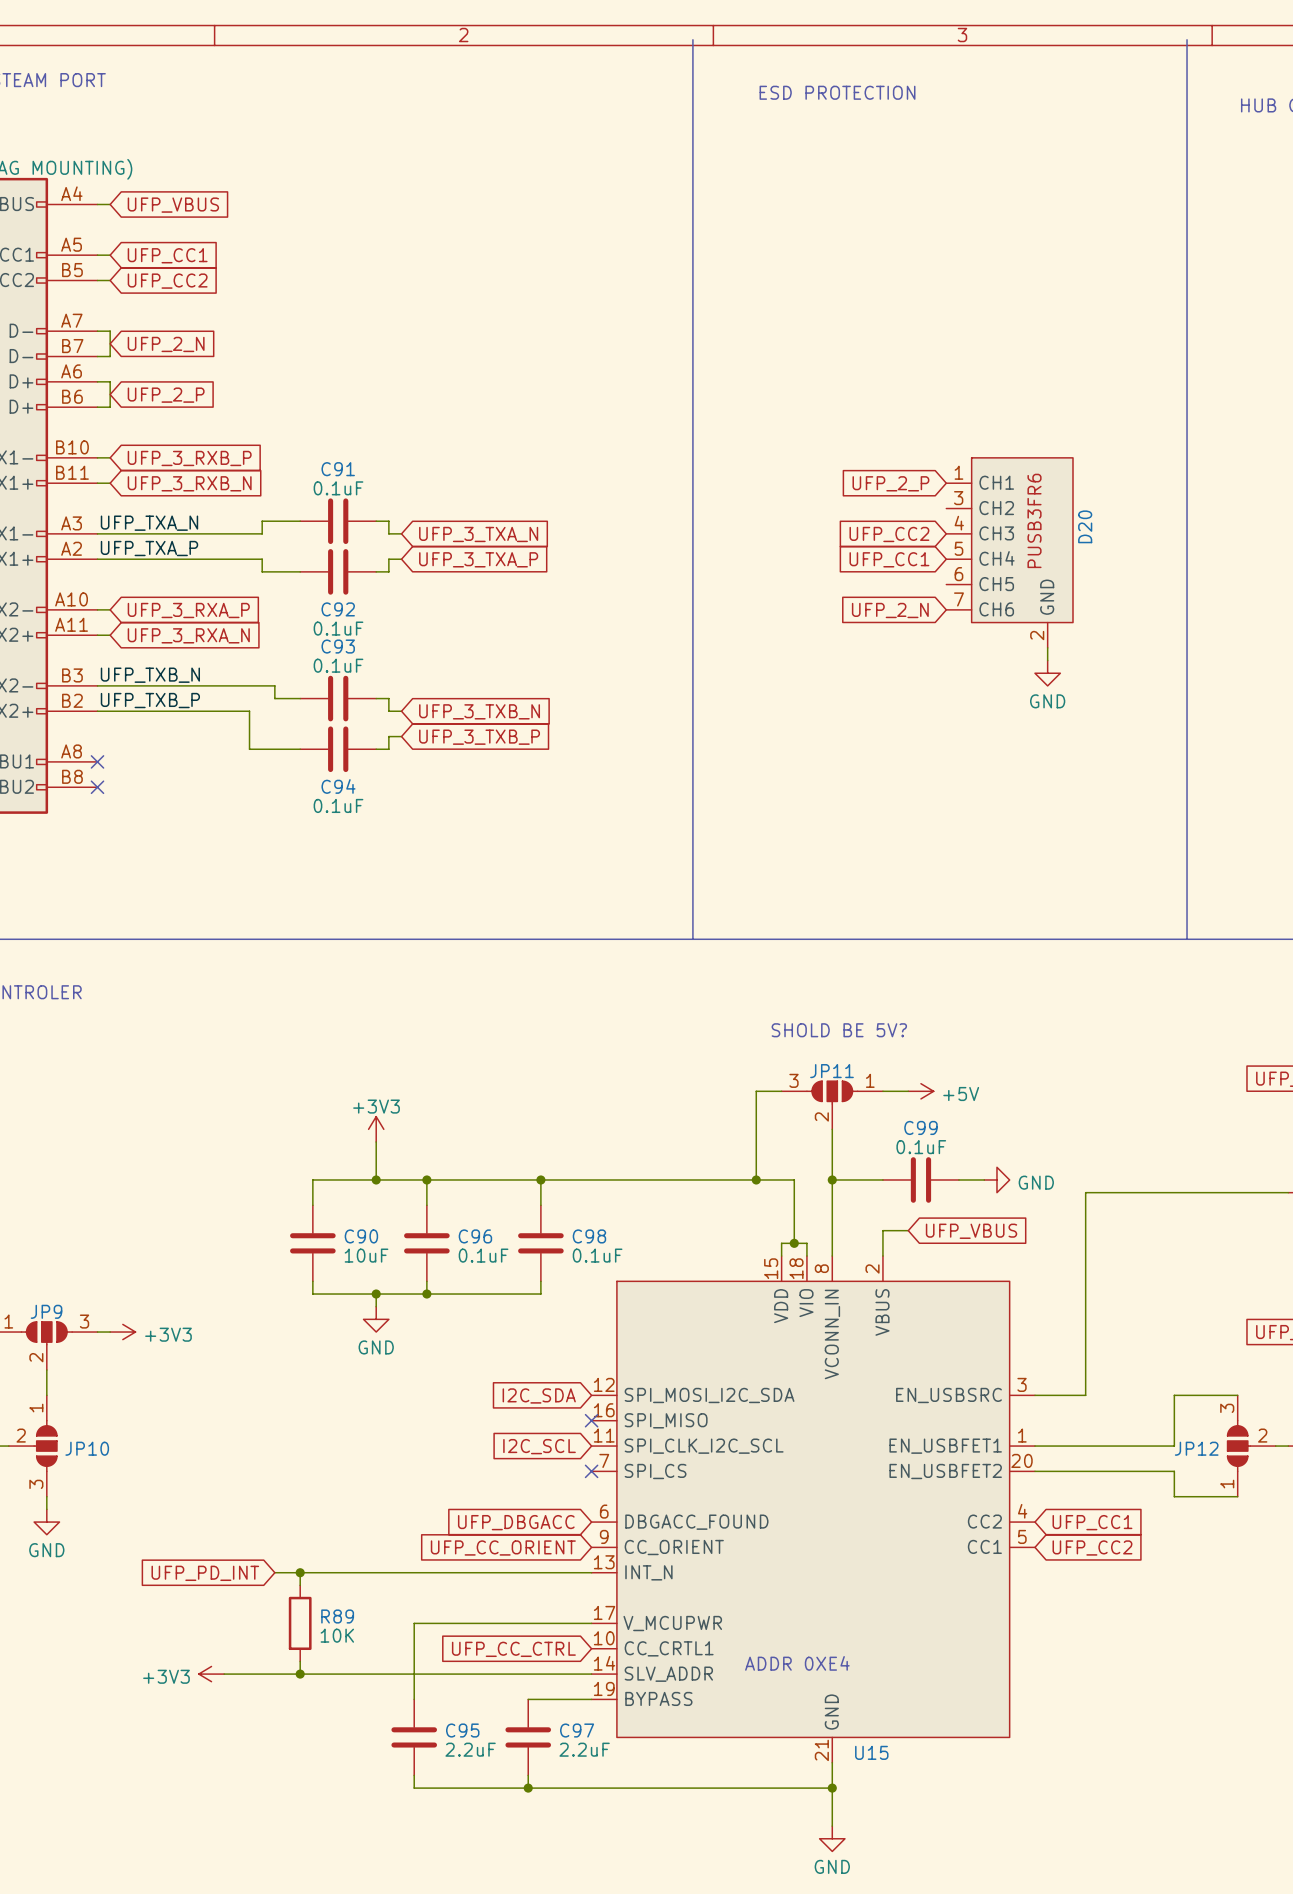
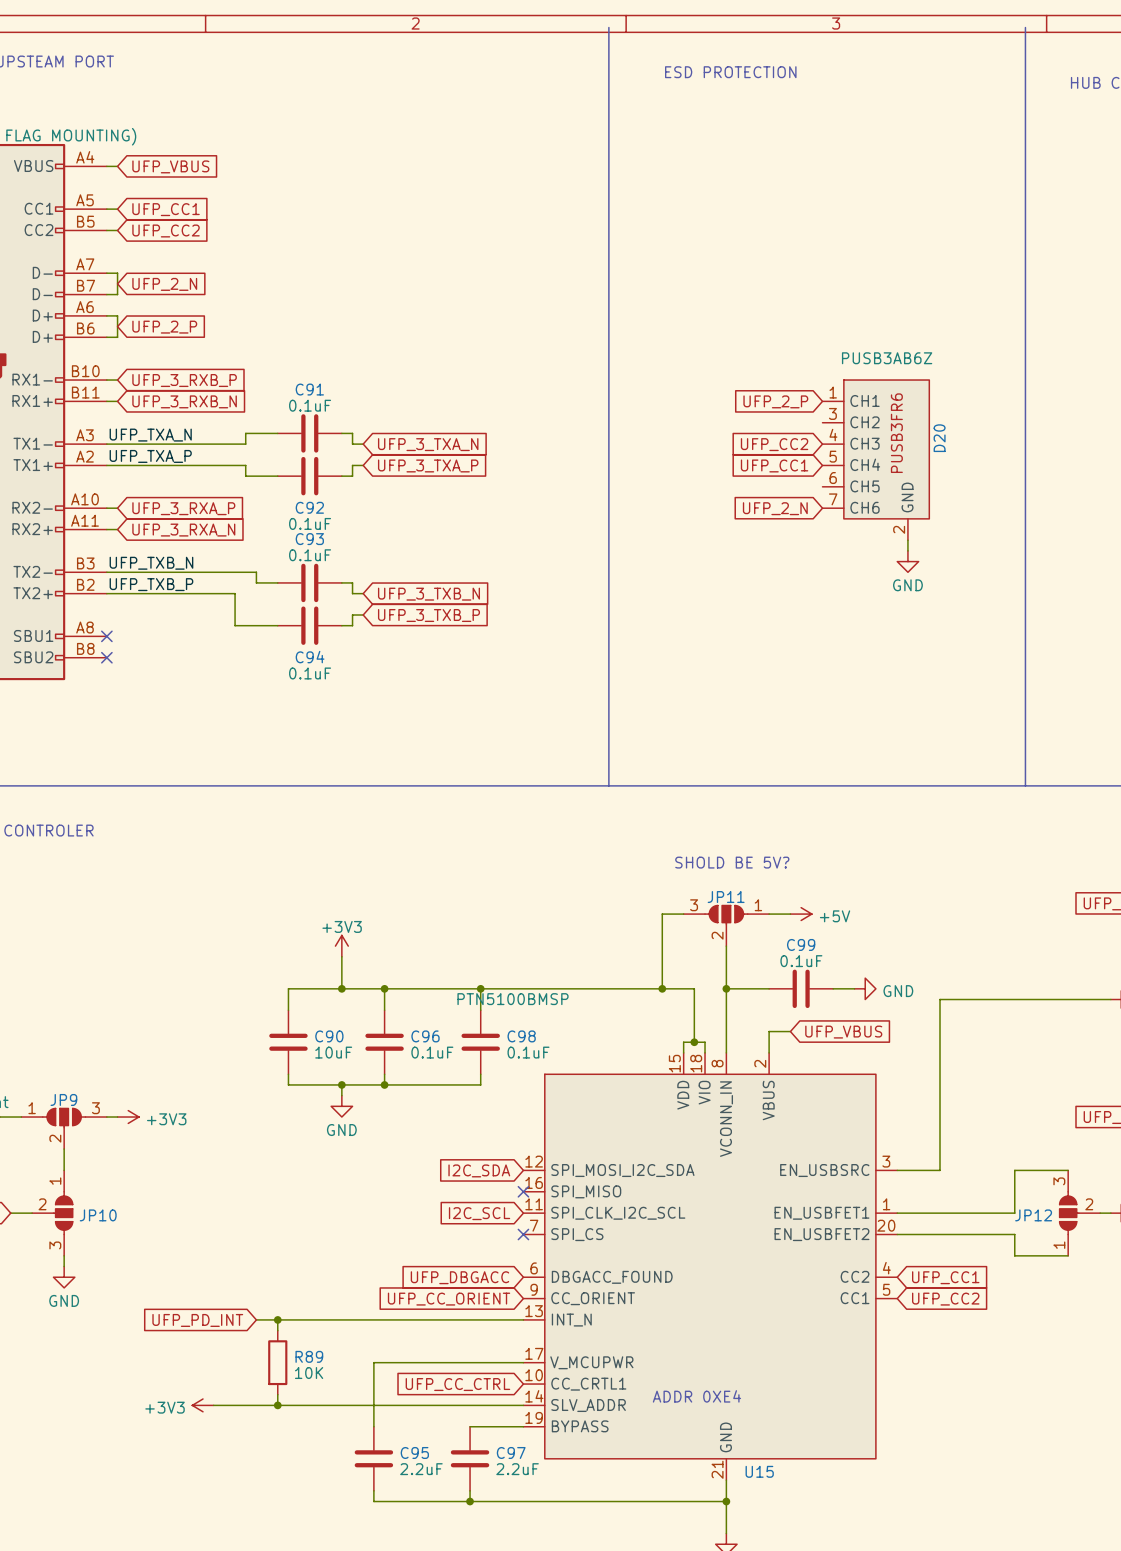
D20 value: none -> PUSB3AB6Z (887, 358)
U15 value: none -> PTN5100BMSP (513, 999)

